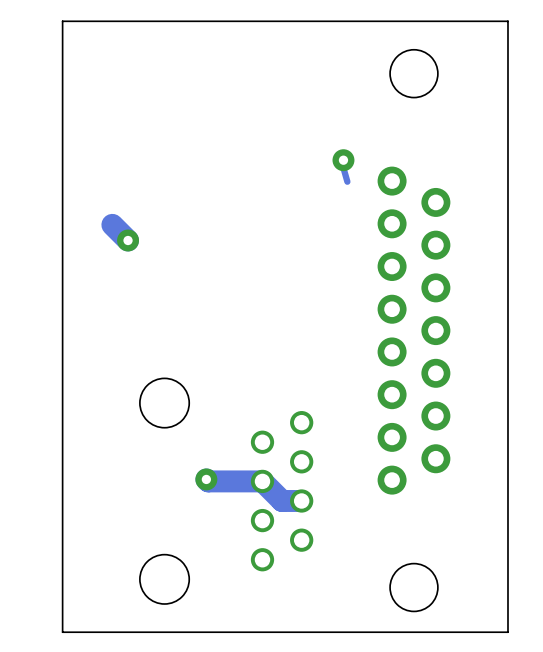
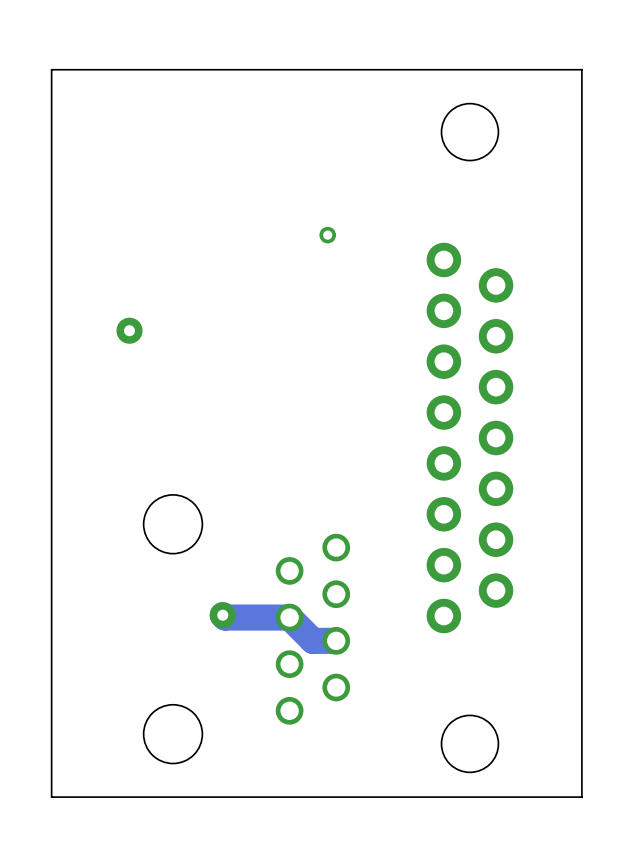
via: none -> (327, 235)
track: (343, 160) (347, 181) -> none
via: (343, 160) -> none
track: (112, 224) (128, 240) -> none

